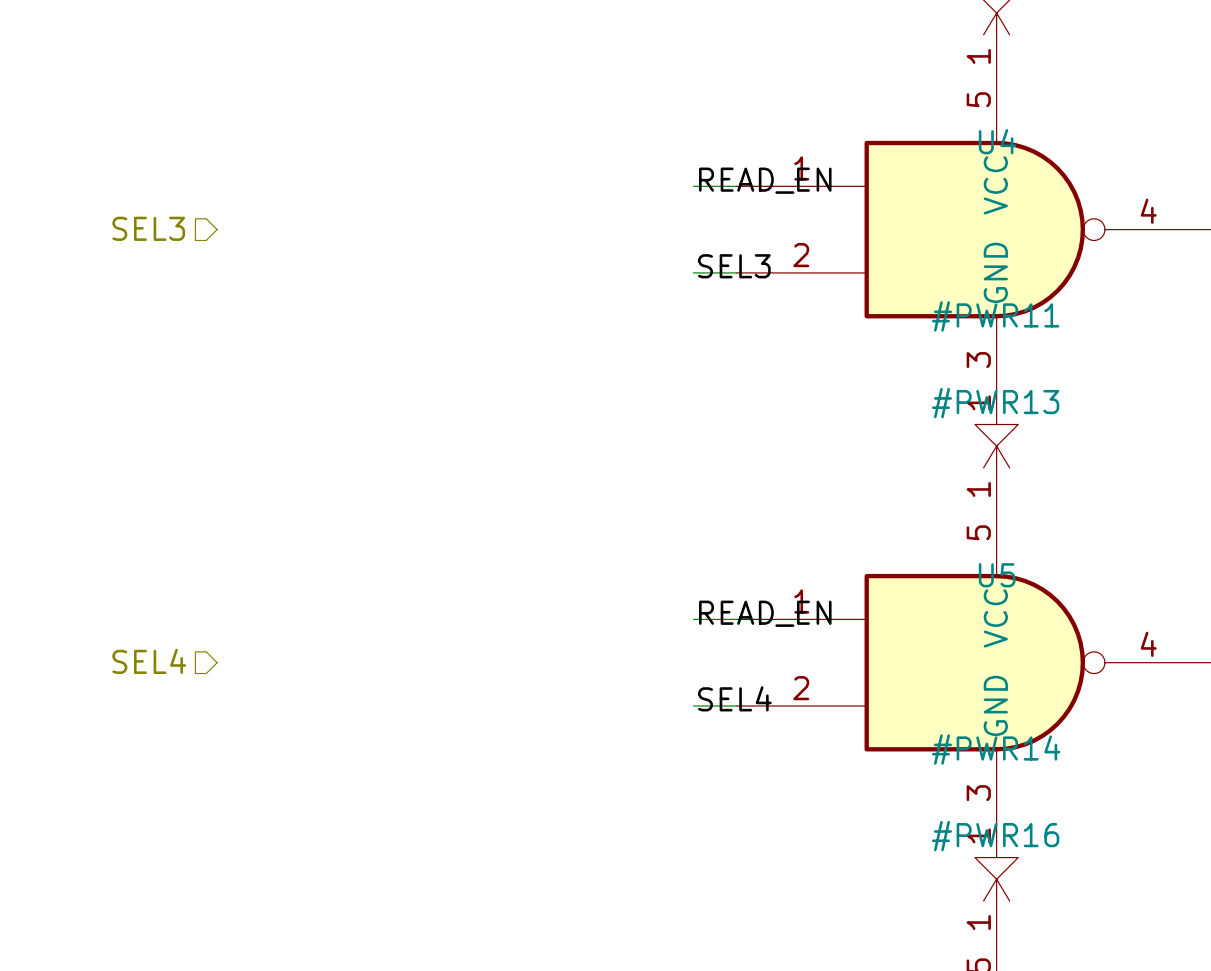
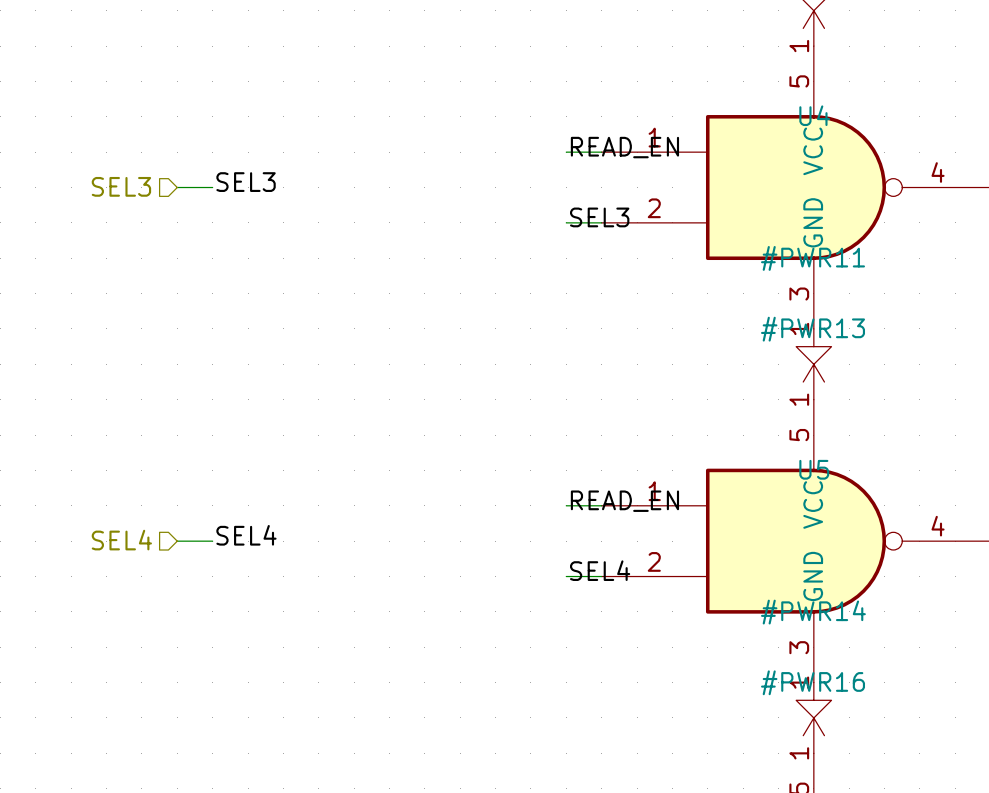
label: none -> SEL3 (246, 182)
wire: none -> (177, 187) (212, 187)
label: none -> SEL4 (246, 535)
wire: none -> (177, 541) (212, 541)

